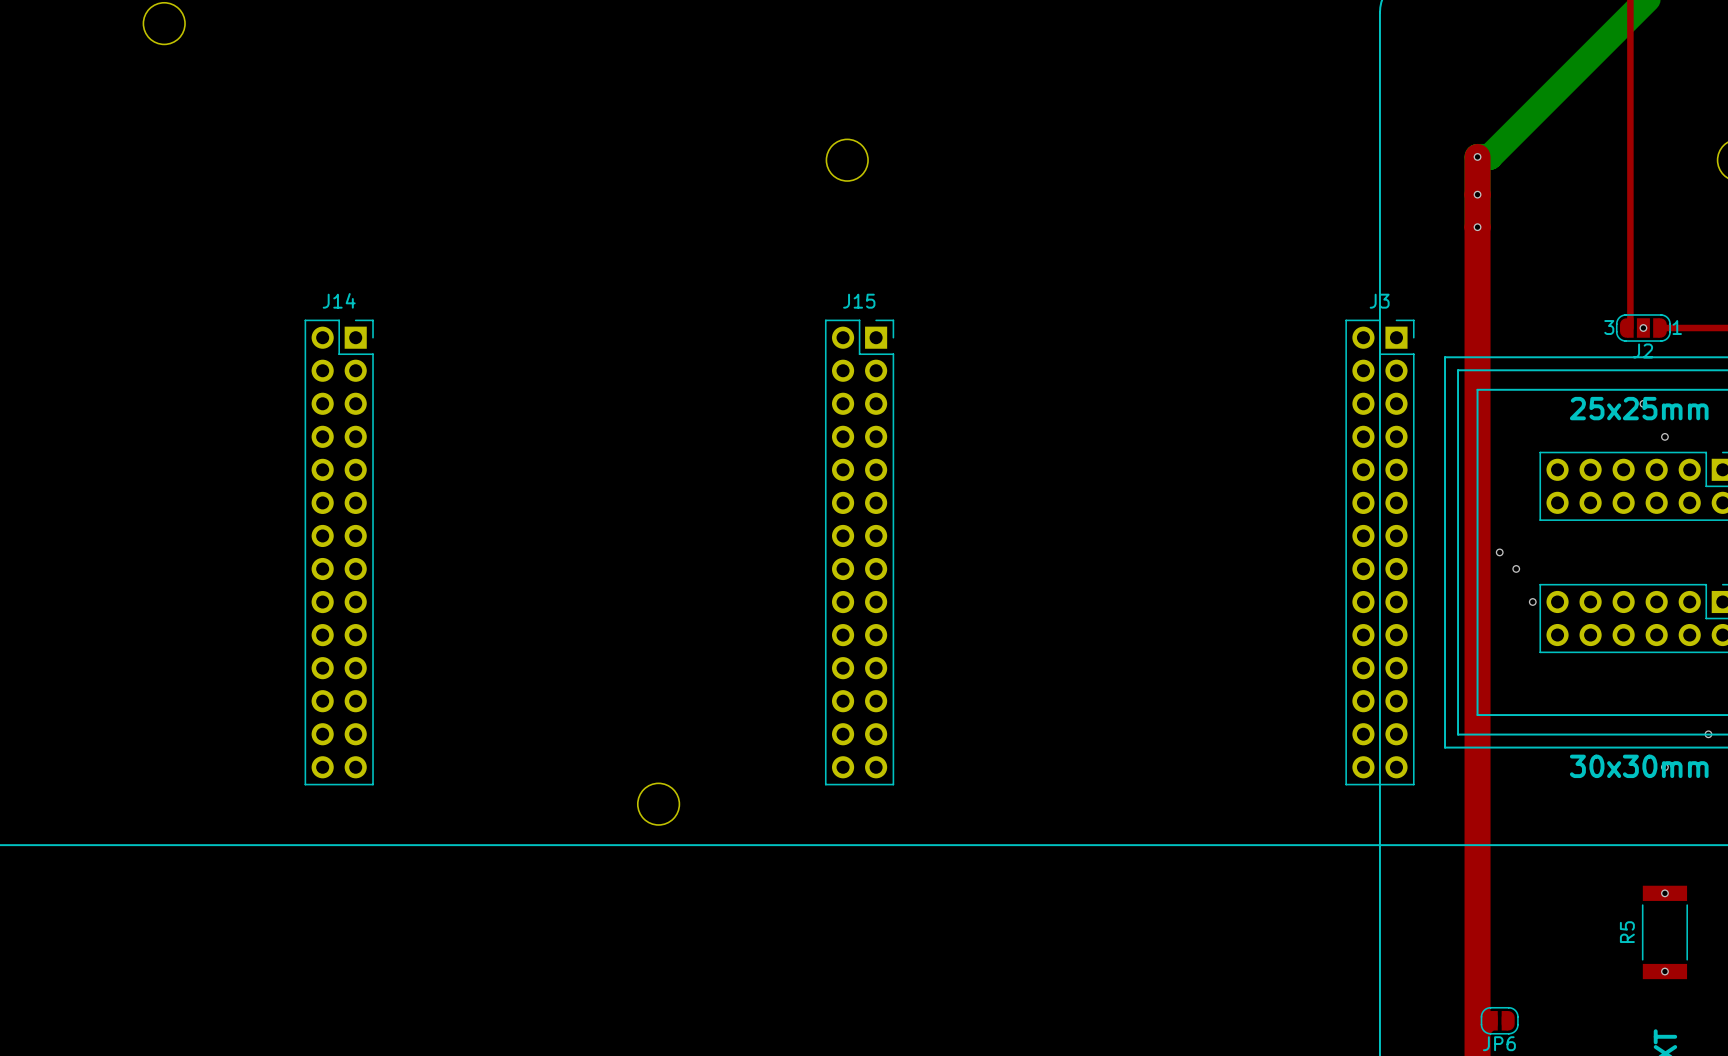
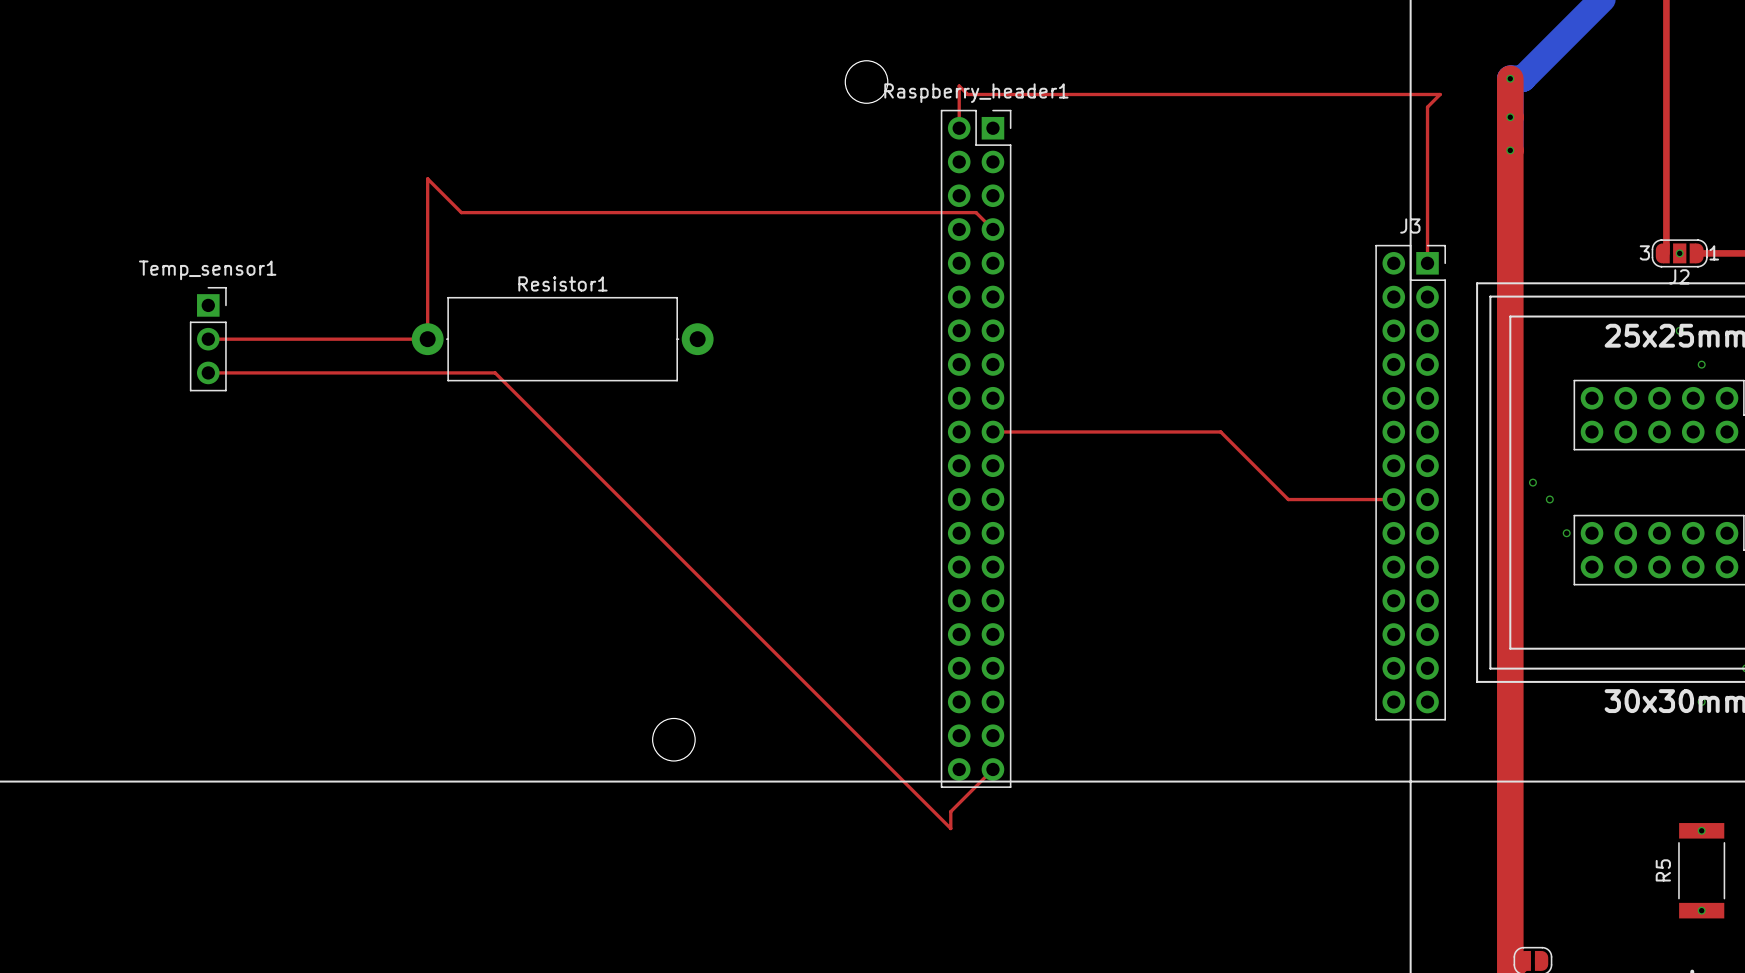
top track: none -> (959, 128) (959, 86) (967, 94) (1440, 94) (1427, 107) (1427, 263)
top track: none -> (992, 229) (976, 212) (461, 212) (427, 178) (427, 339) (208, 339)
Temp_sensor1: none -> (208, 339)
Resistor1: none -> (562, 339)
top track: none -> (208, 372) (495, 372) (950, 828) (950, 811) (992, 769)
top track: none -> (992, 431) (1220, 431) (1288, 499) (1393, 499)
Raspberry_header1: none -> (976, 448)
J14: (339, 552) -> none
J15: (859, 552) -> none

